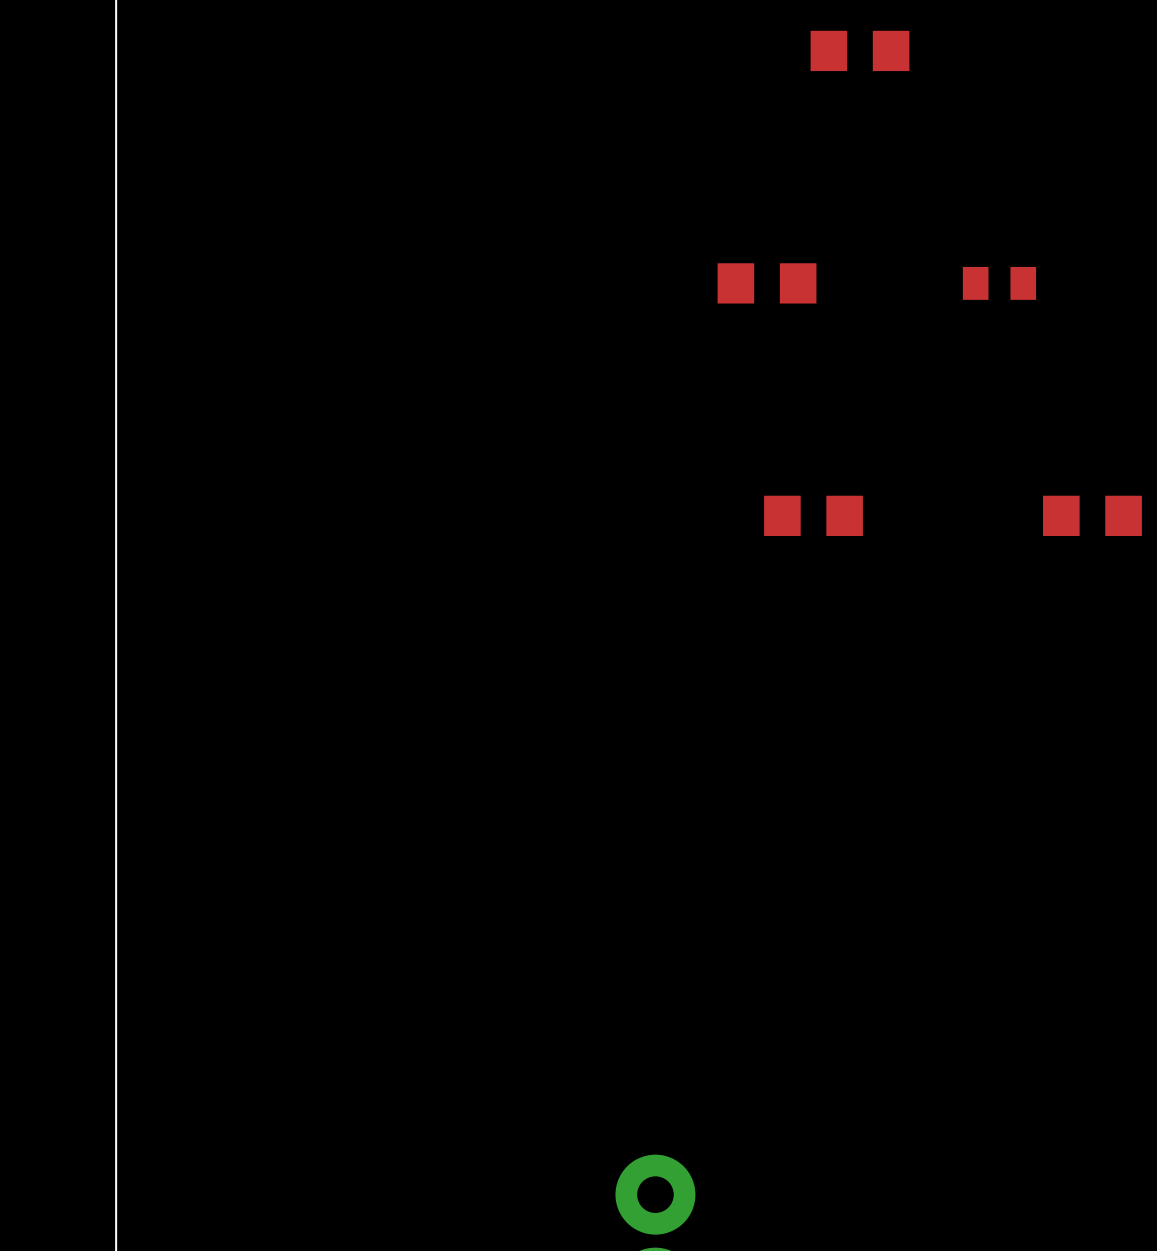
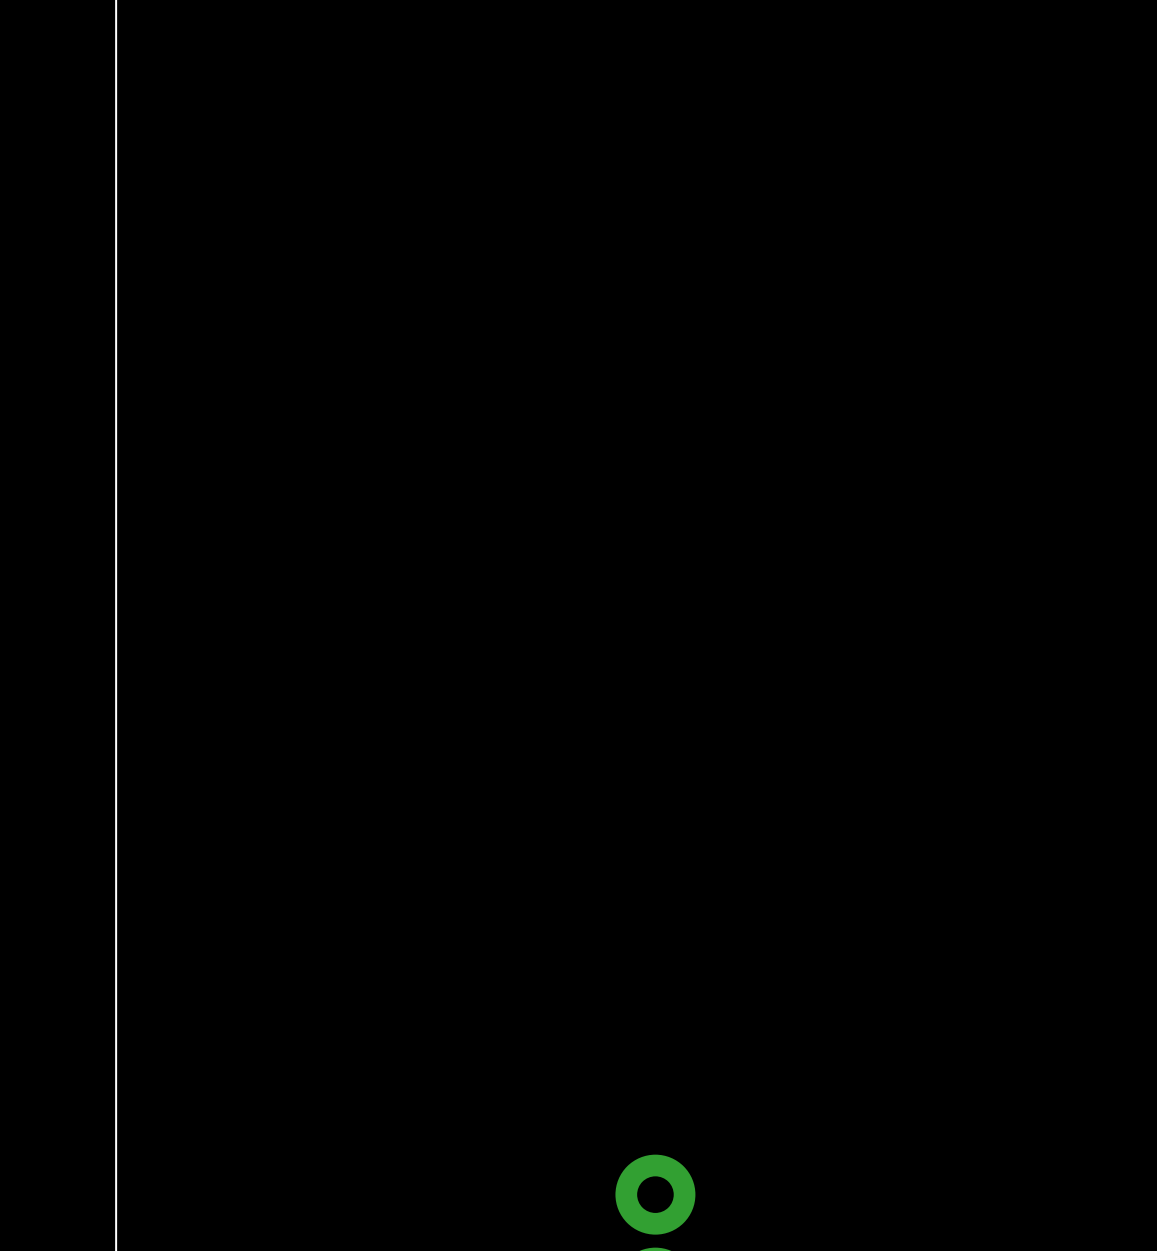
part: (860, 50) -> none
part: (767, 283) -> none
part: (999, 283) -> none
part: (813, 515) -> none
part: (1092, 515) -> none

